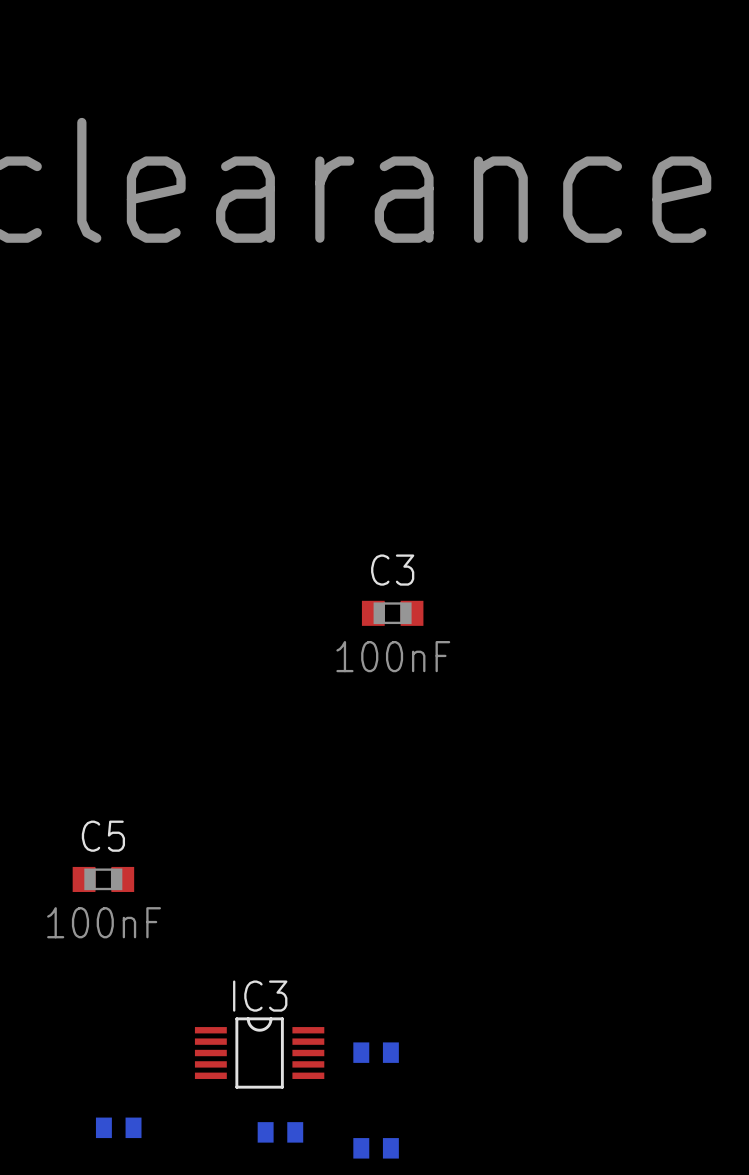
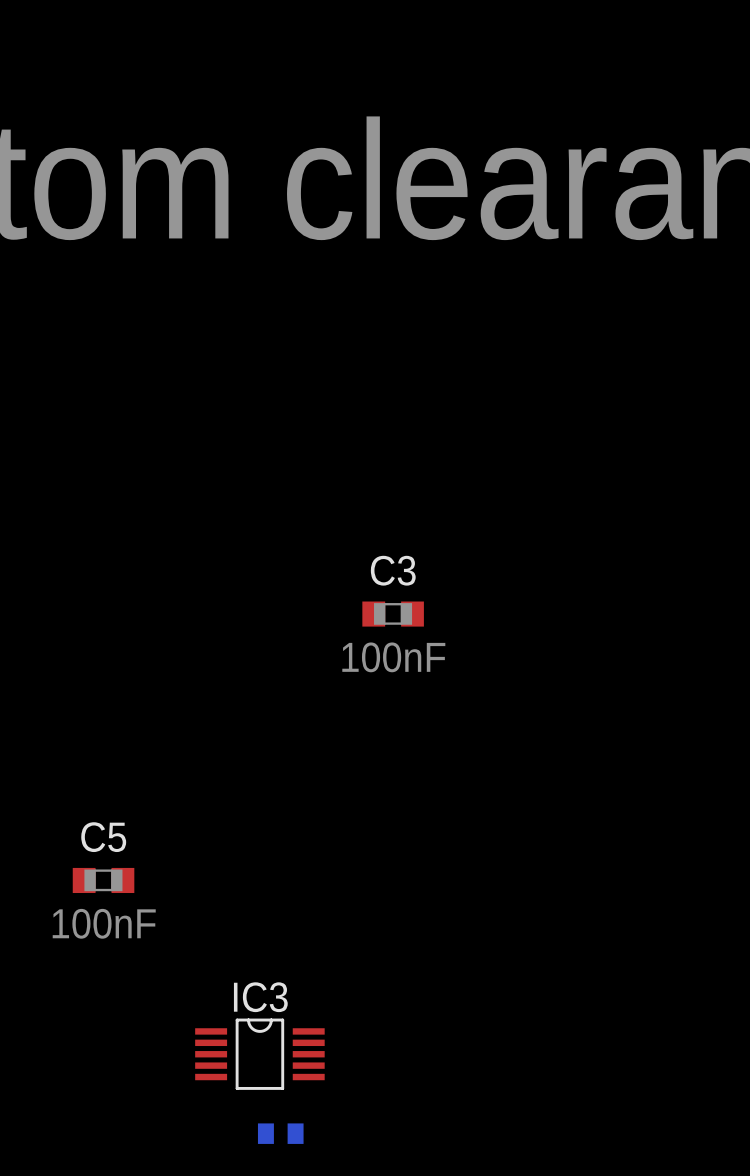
part: (376, 1052) -> none
part: (118, 1127) -> none
part: (376, 1148) -> none

